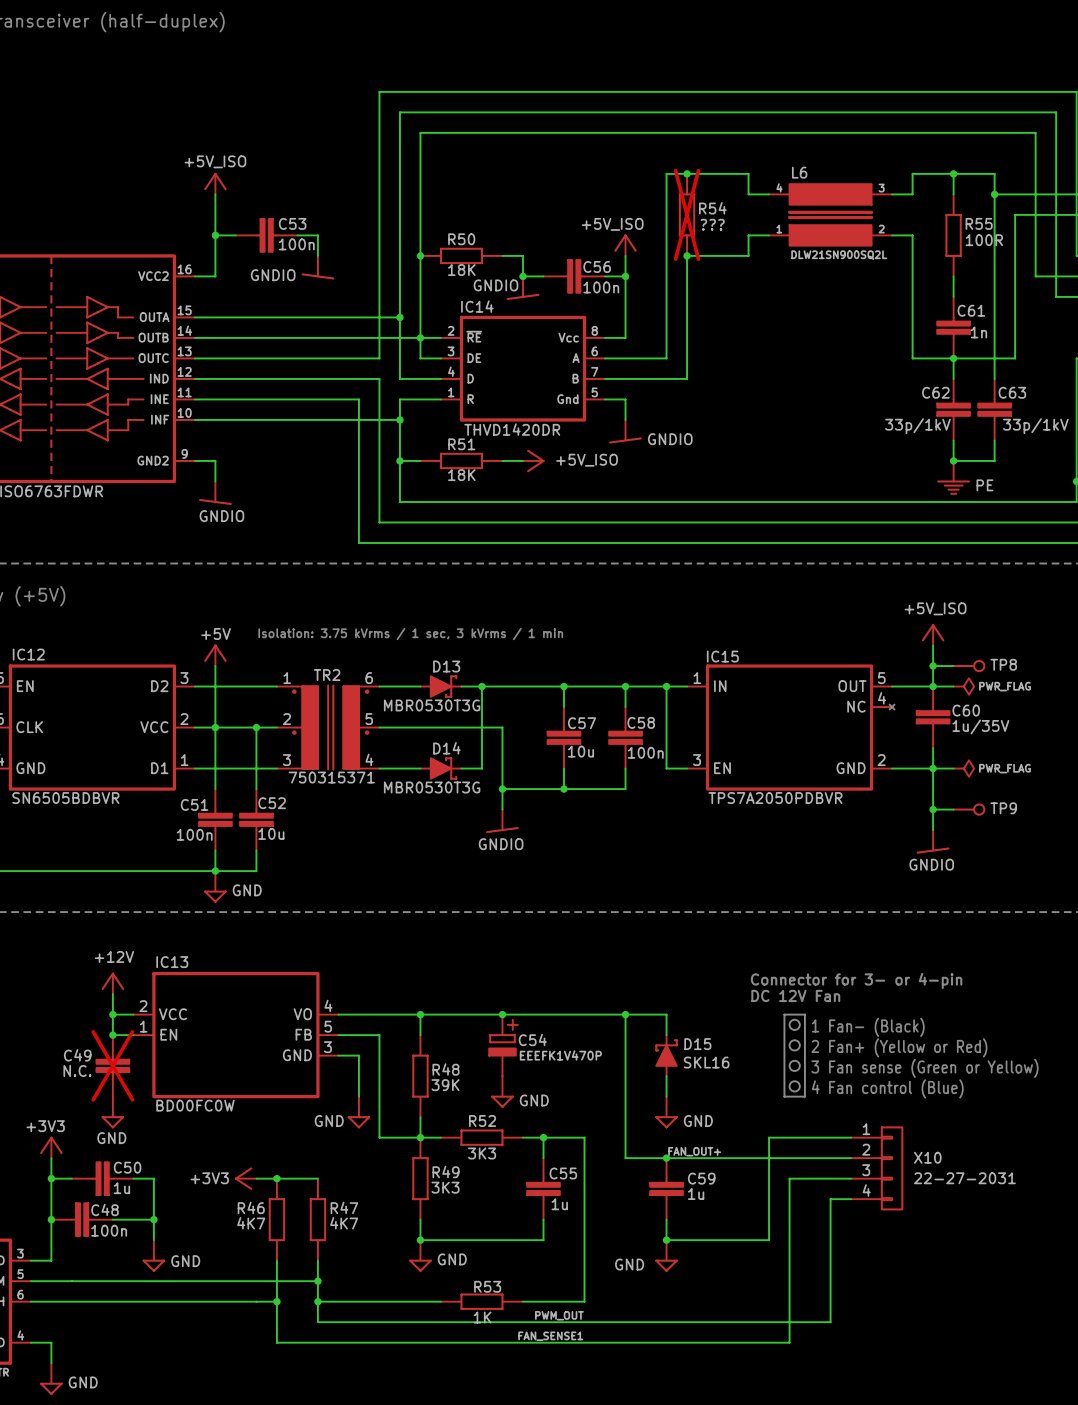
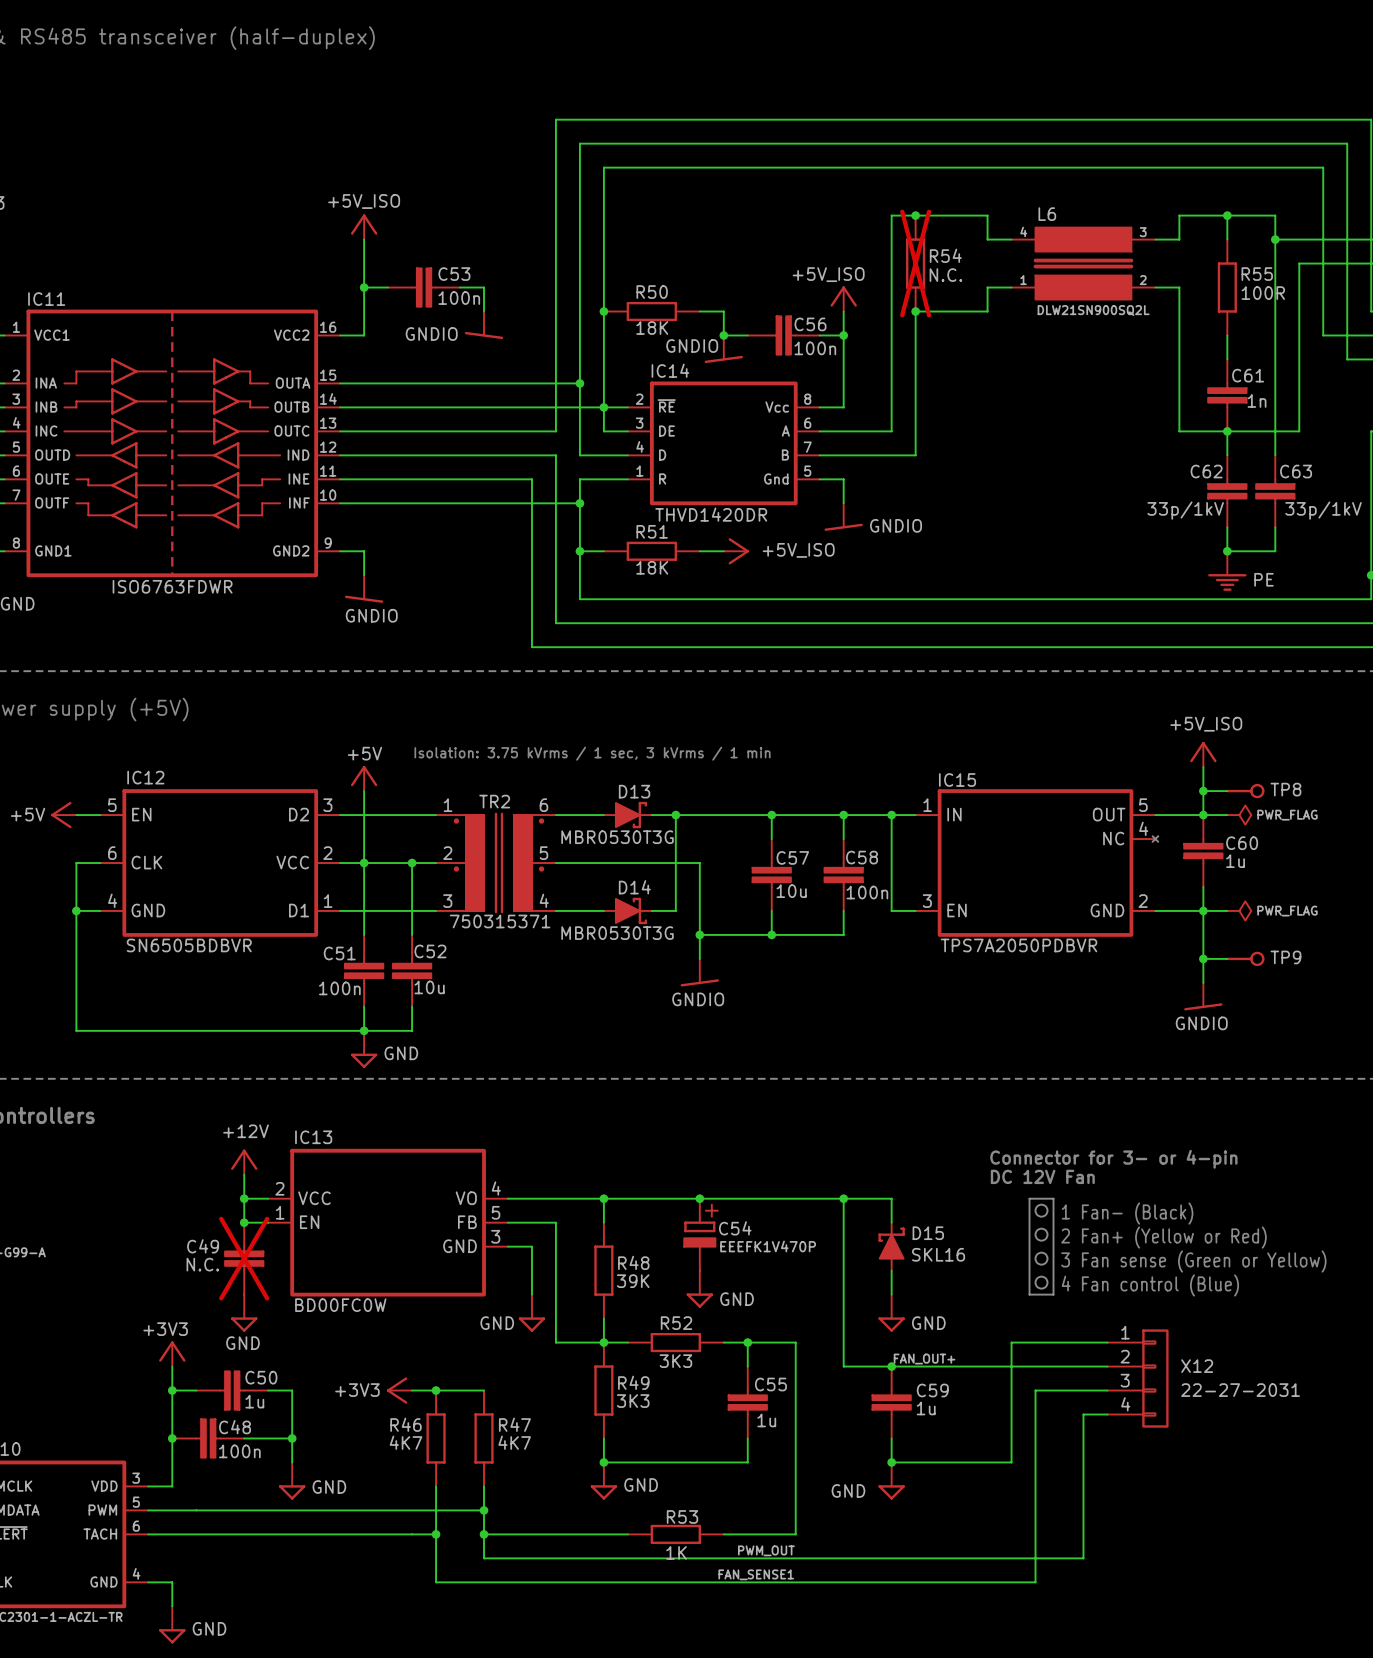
R54 value: ??? (712, 224) -> N.C. (945, 275)
C60 value: 1u/35V (980, 726) -> 1u (1235, 861)
X10 name: X10 (927, 1157) -> X12 (1197, 1366)

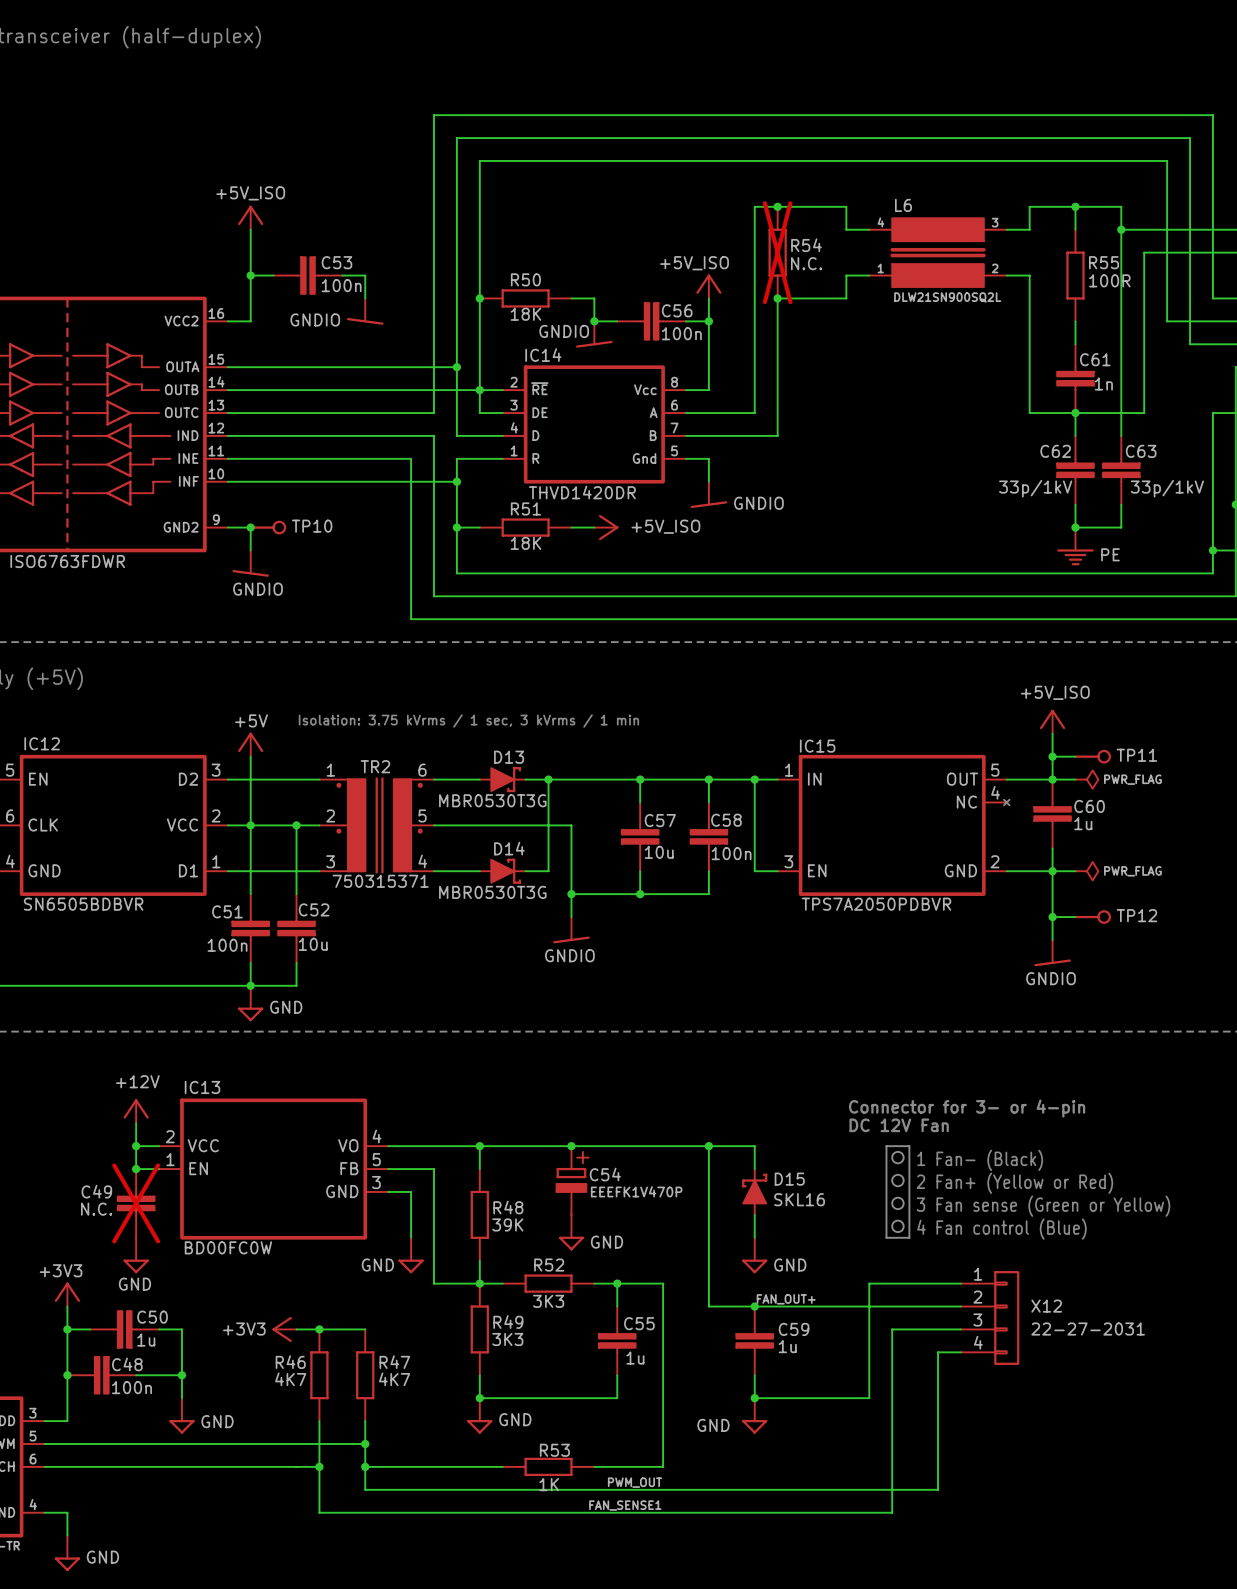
junction: none -> (250, 527)
TP10: none -> (267, 527)
TP8 name: TP8 (1285, 789) -> TP11 (1136, 755)
TP9 name: TP9 (1285, 957) -> TP12 (1136, 915)

